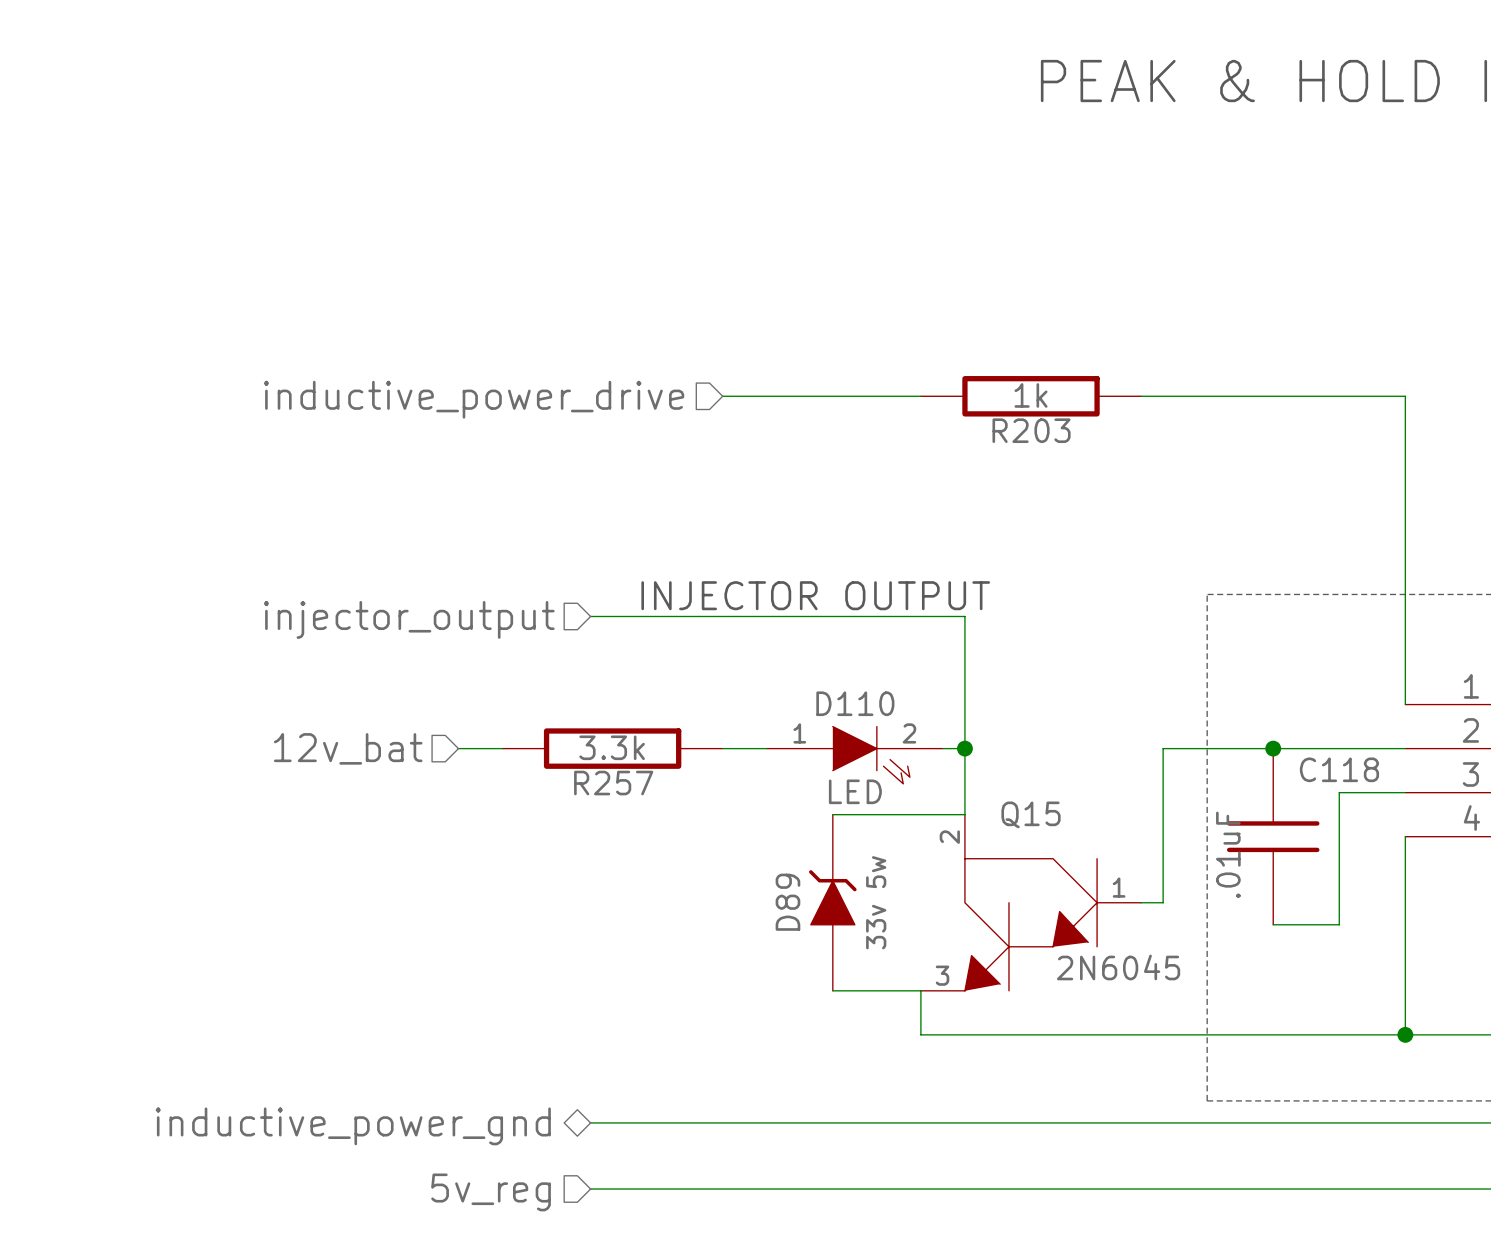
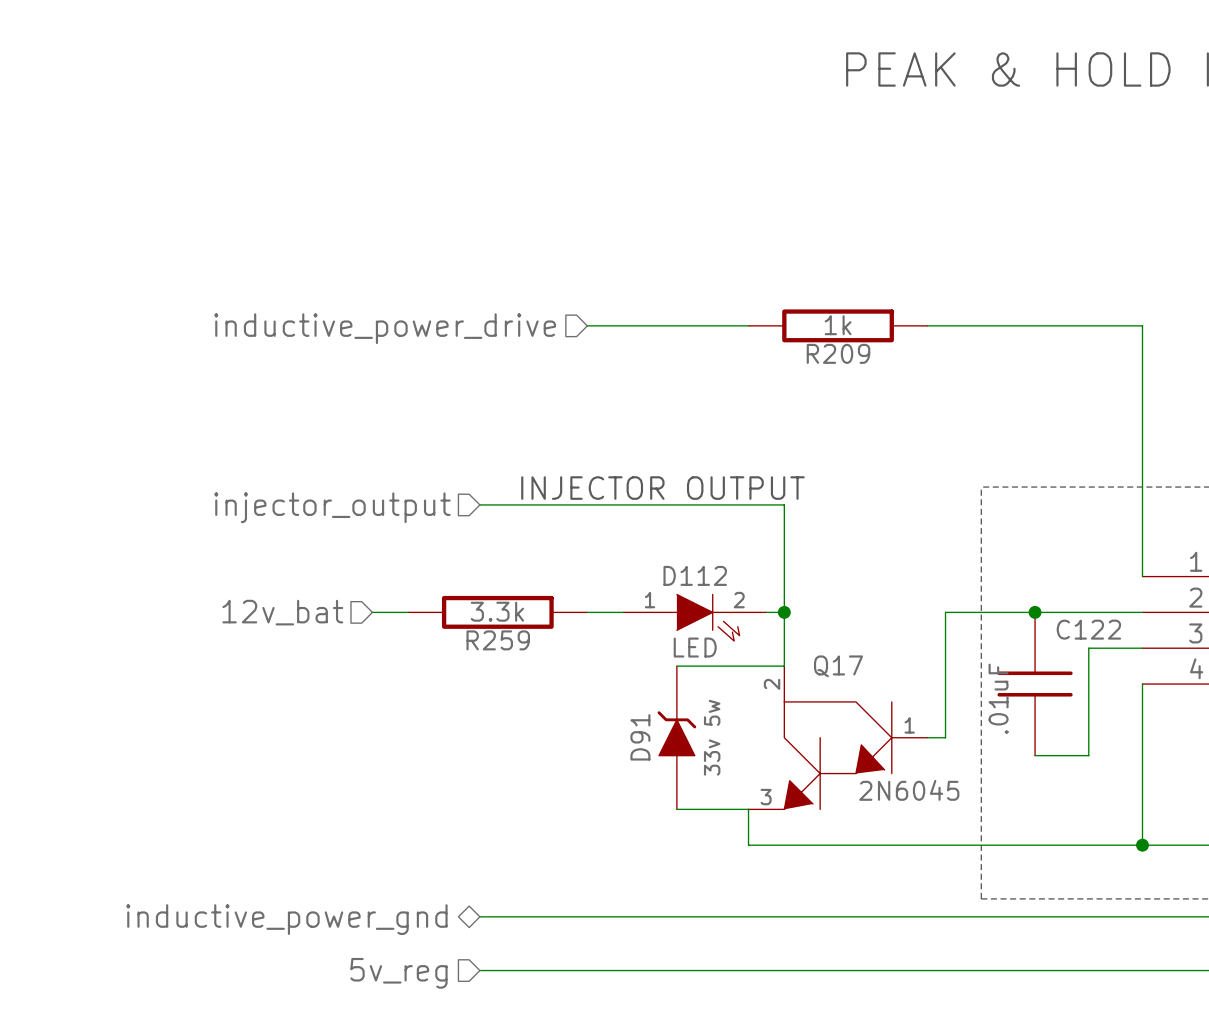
R203 name: R203 (1031, 430) -> R209 (838, 353)
D110 name: D110 (855, 703) -> D112 (695, 575)
C118 name: C118 (1339, 769) -> C122 (1088, 629)
R257 name: R257 (613, 783) -> R259 (498, 640)
Q15 name: Q15 (1031, 814) -> Q17 (838, 666)
D89 name: D89 (787, 902) -> D91 (640, 737)

